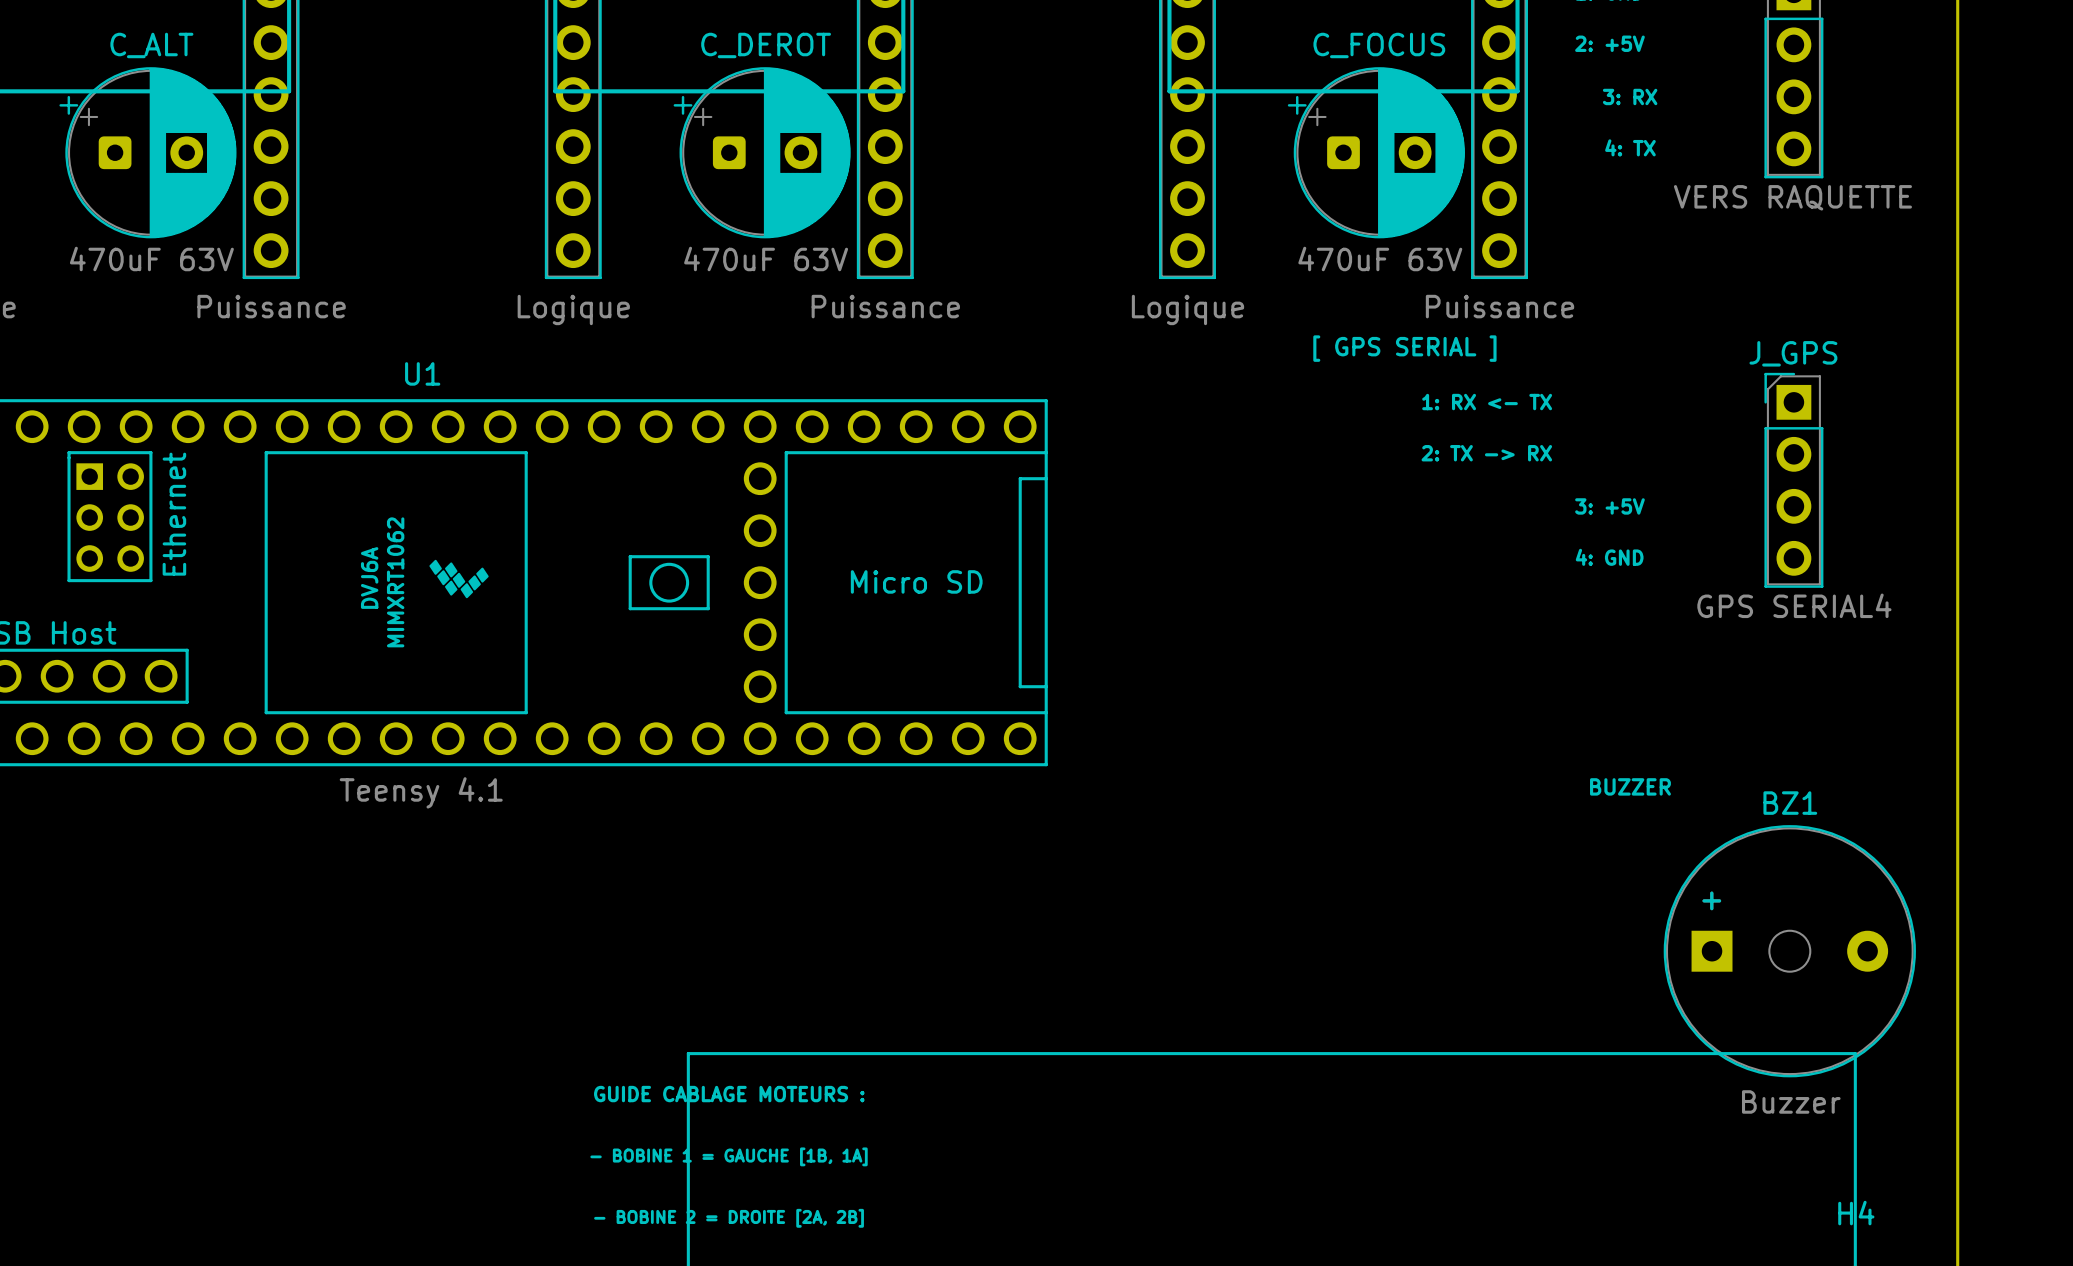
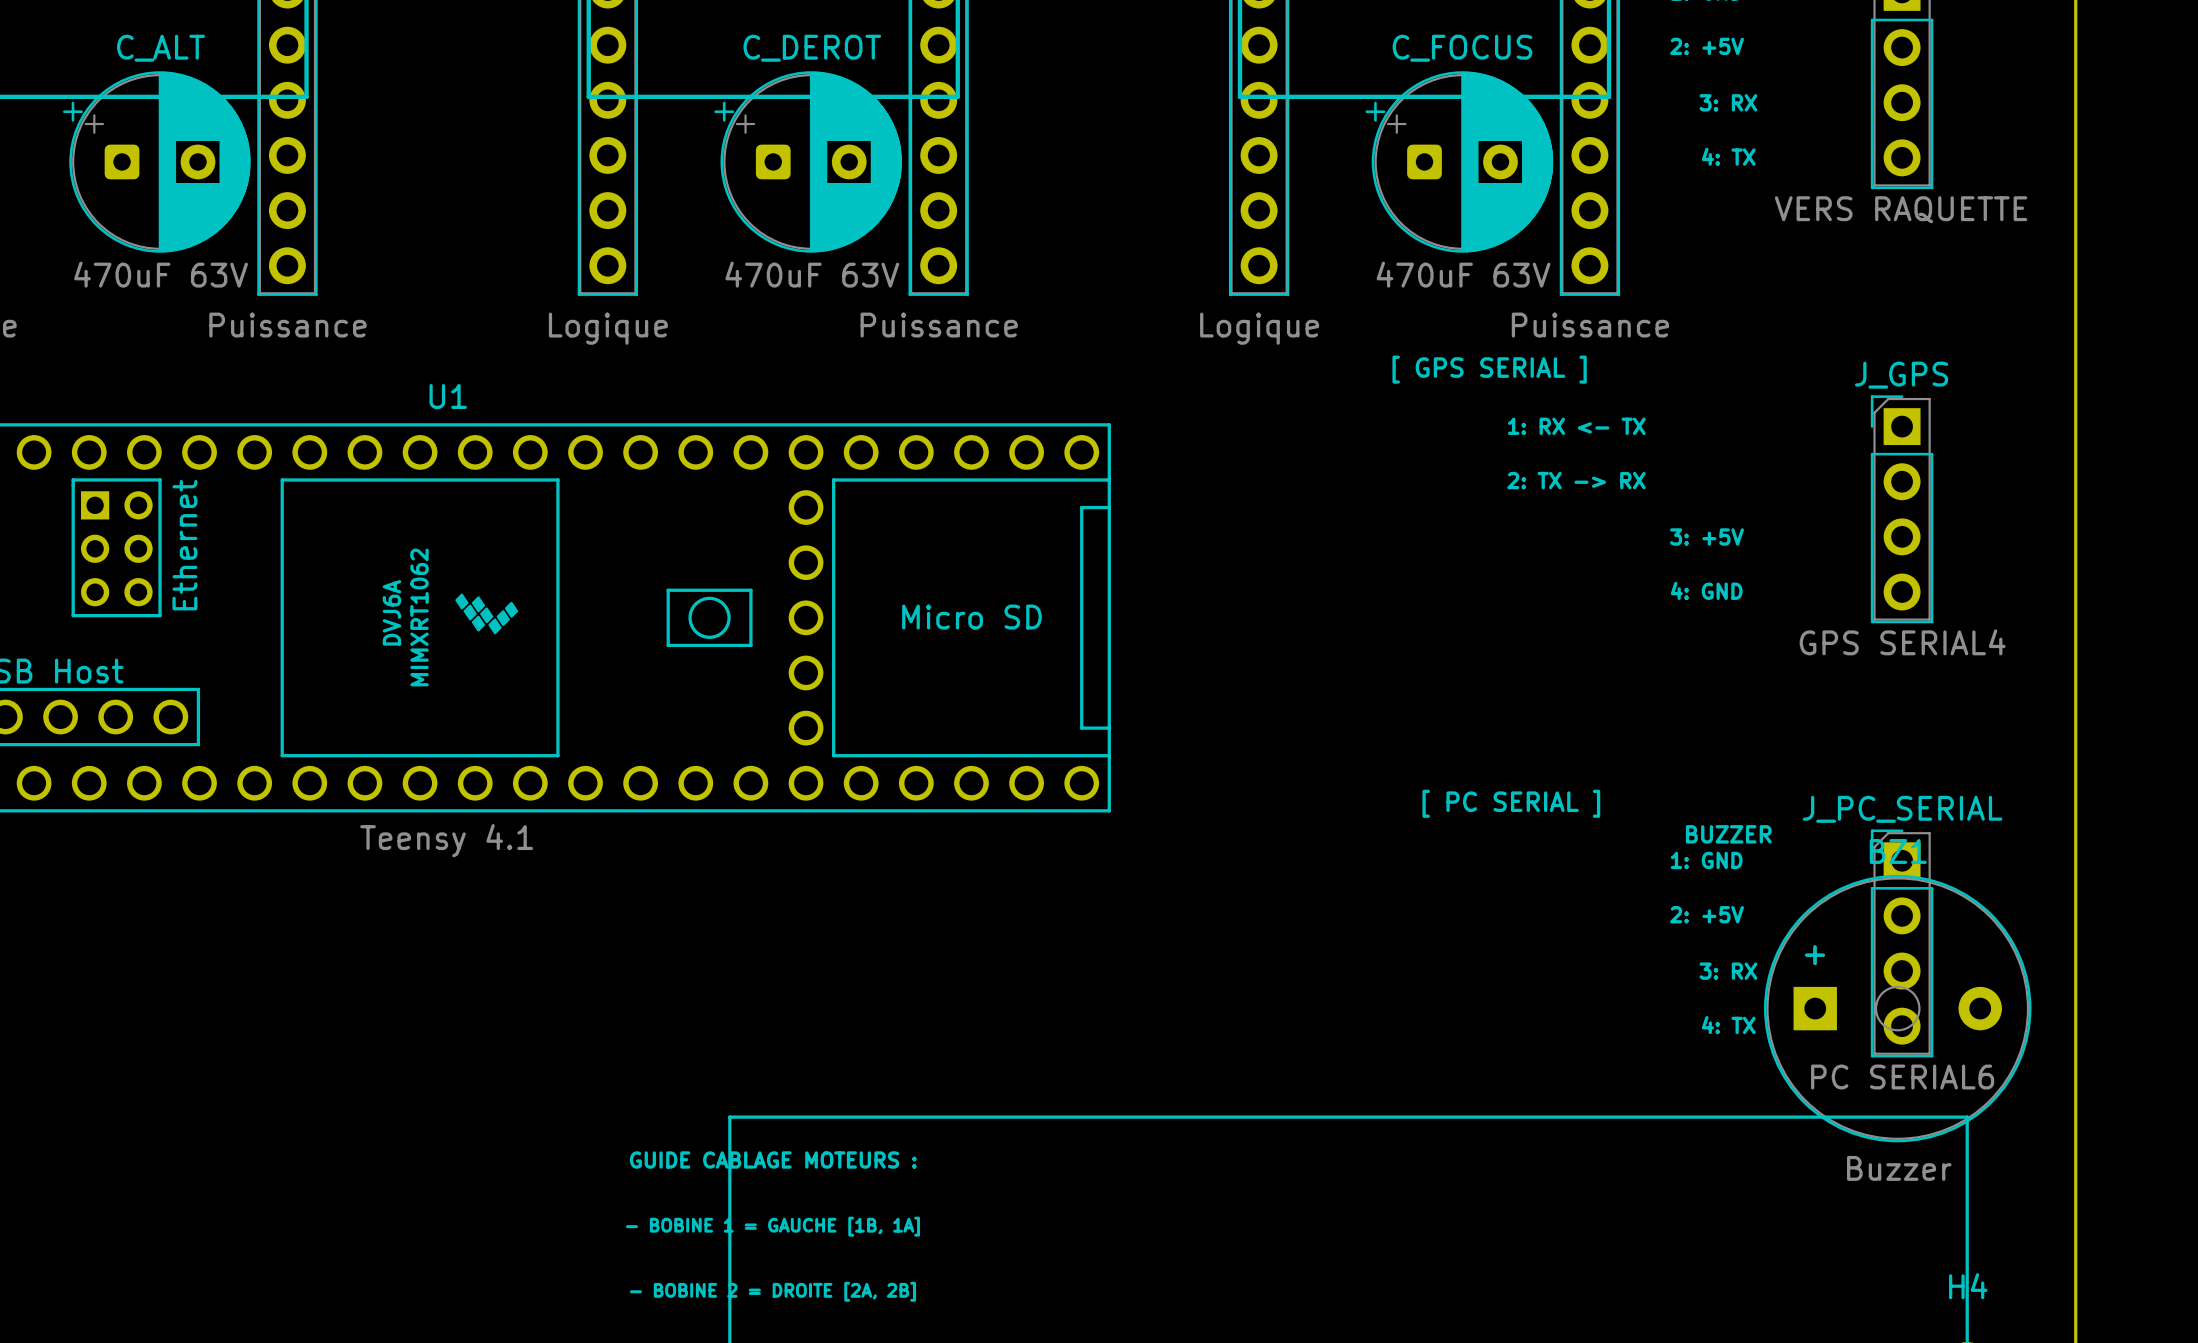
text: none -> [ PC SERIAL ] (1511, 803)
text: none -> 1: GND (1706, 860)
text: none -> 2: +5V (1707, 914)
J_PC_SERIAL: none -> PC SERIAL6 (1902, 943)
text: none -> 3: RX (1728, 971)
text: none -> 4: TX (1728, 1025)

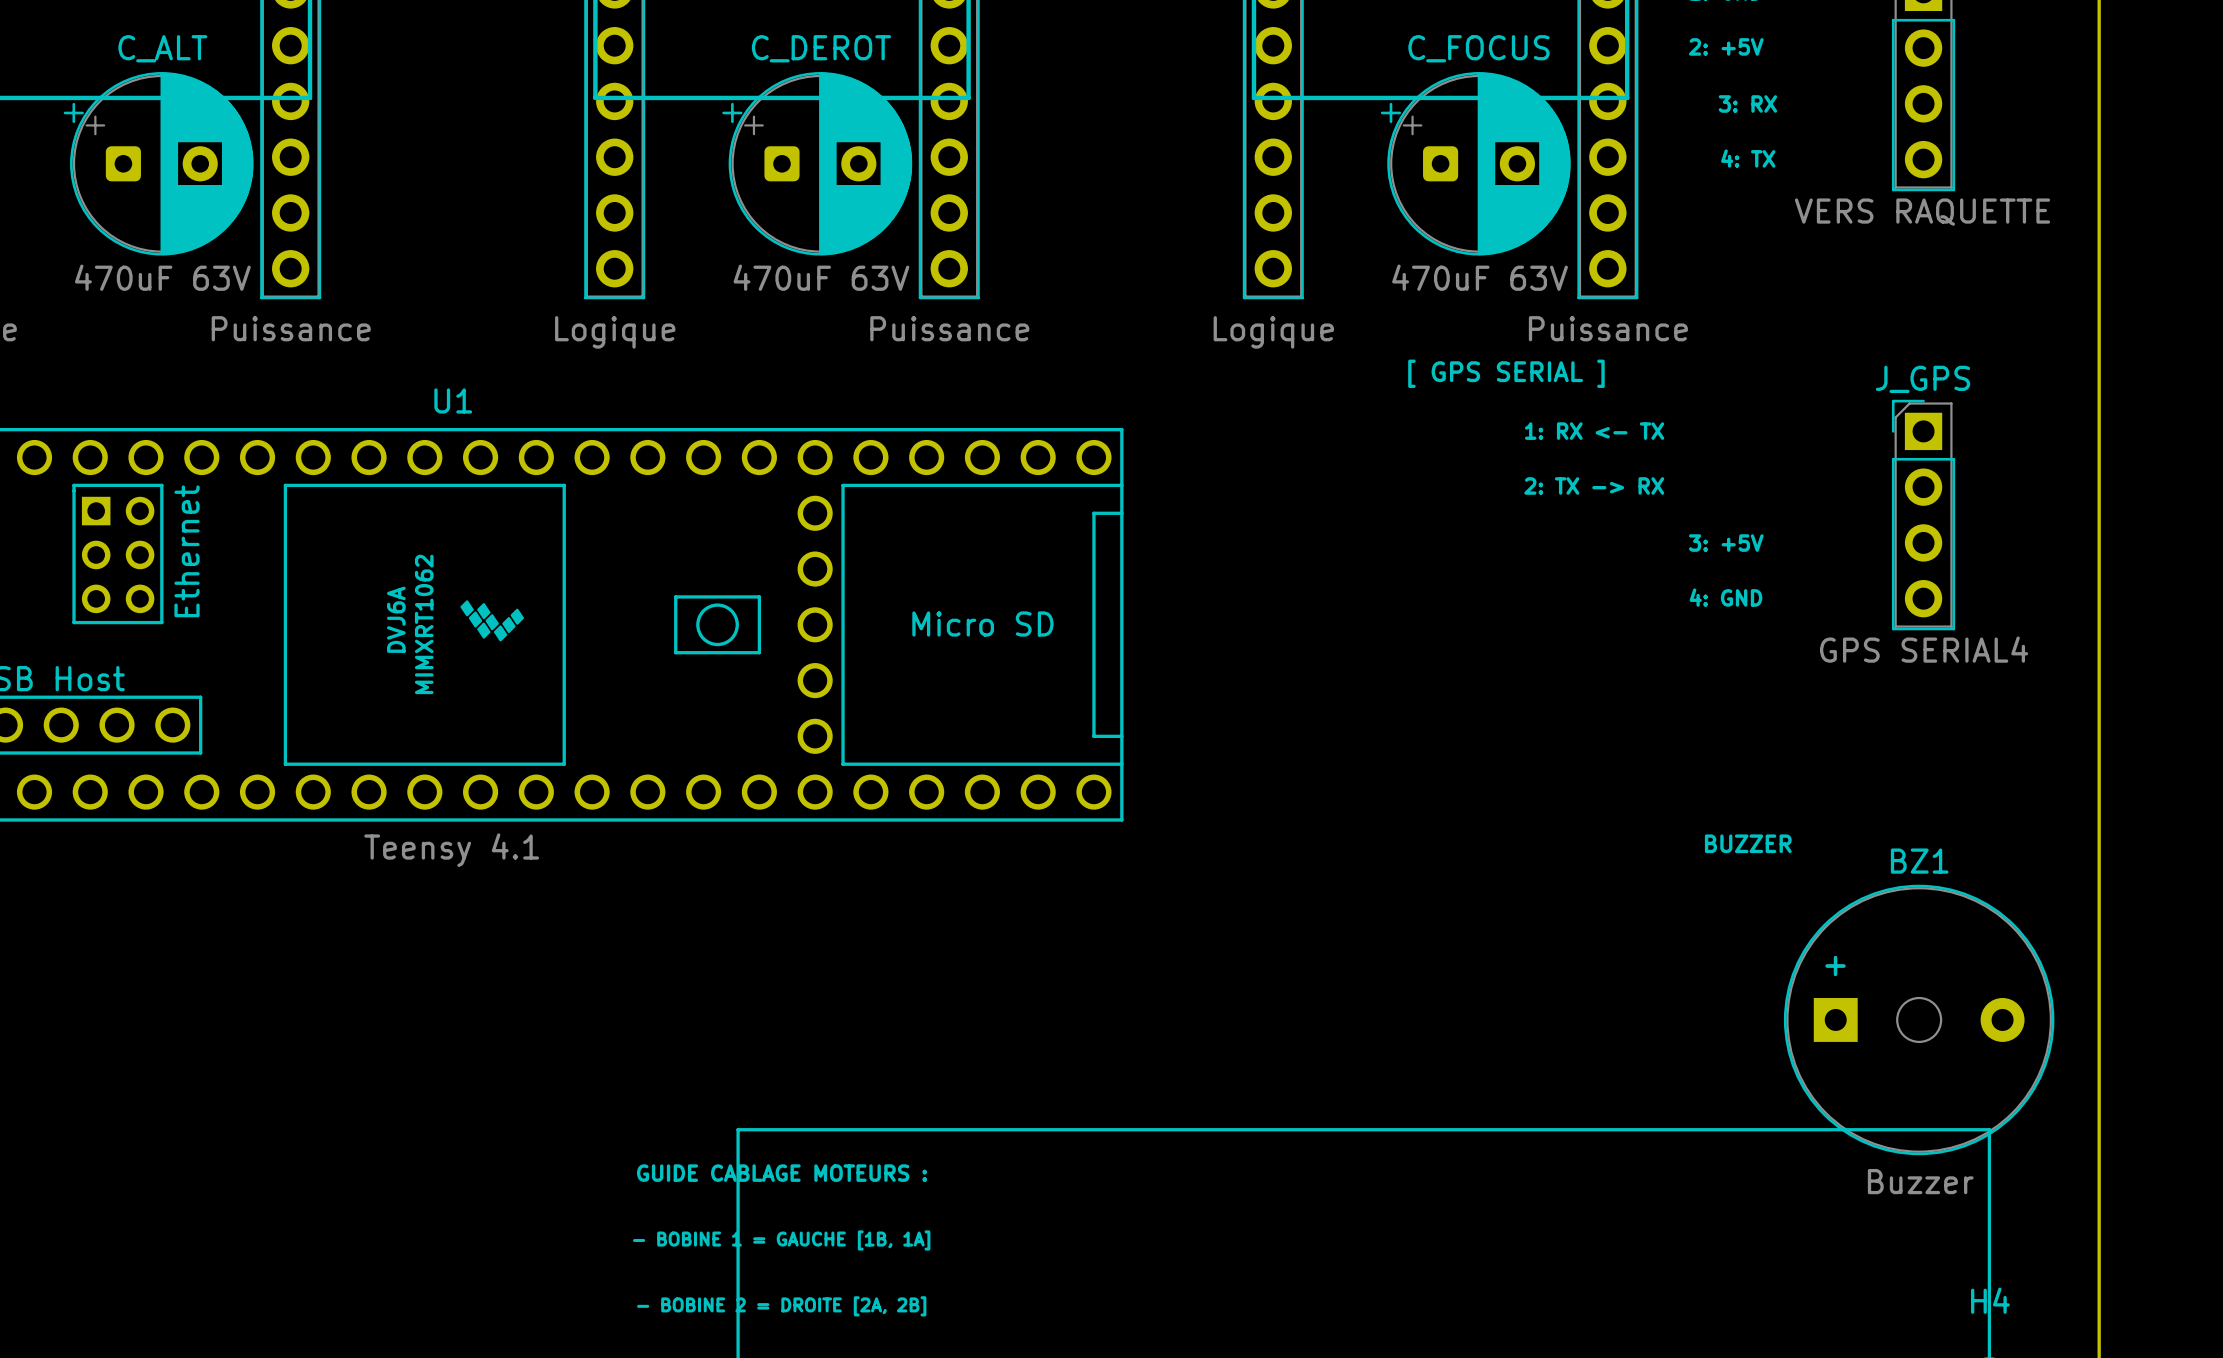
text: [ PC SERIAL ] (1511, 803) -> none
text: 1: GND (1706, 860) -> none
text: 2: +5V (1707, 914) -> none
J_PC_SERIAL: PC SERIAL6 (1902, 943) -> none
text: 3: RX (1728, 971) -> none
text: 4: TX (1728, 1025) -> none

